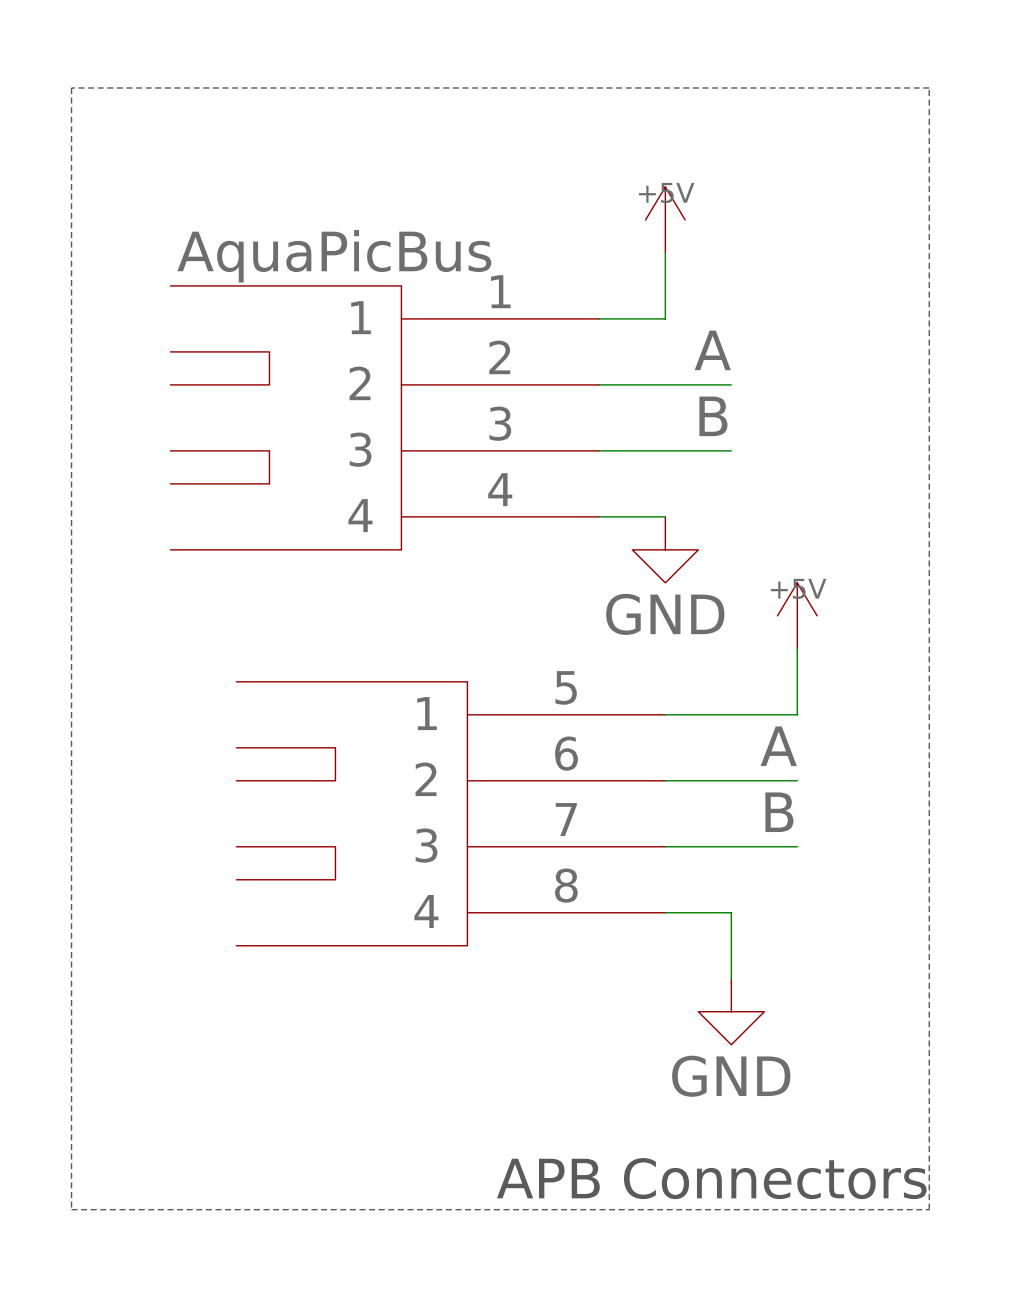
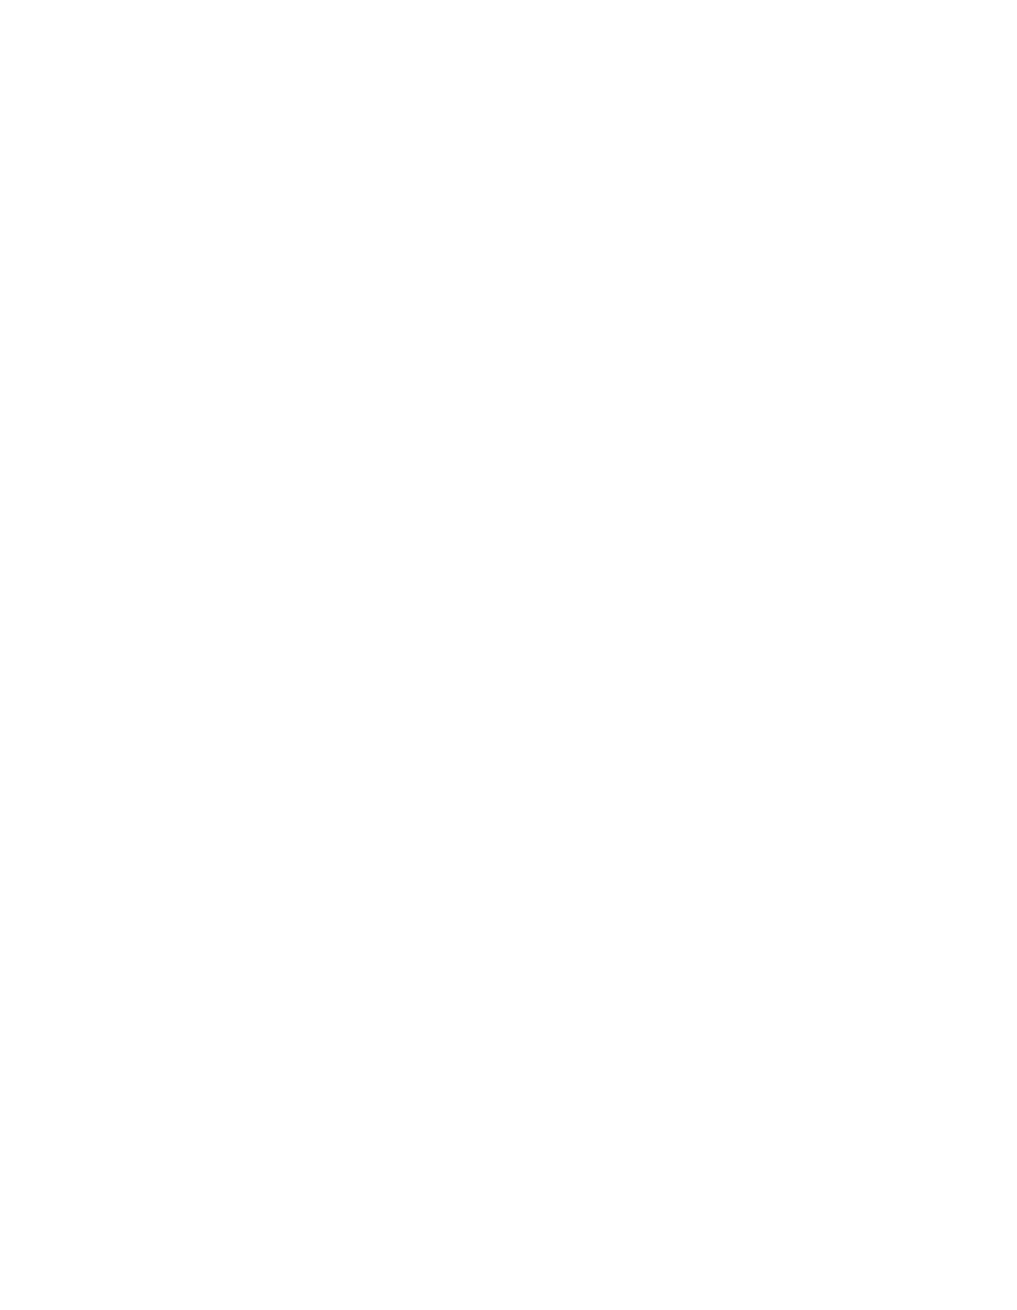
line: (71, 87) (71, 1209) (929, 1209) (929, 87) (71, 87) -> none
power symbol: +5V (665, 219) -> none
wire: (665, 252) (665, 318) (599, 318) -> none
label: A (712, 350) -> none
wire: (599, 384) (731, 384) -> none
label: B (713, 416) -> none
wire: (599, 450) (731, 450) -> none
wire: (599, 516) (665, 516) -> none
power symbol: GND (665, 549) -> none
AquaPicBus: (417, 615) -> none
power symbol: +5V (797, 615) -> none
wire: (797, 648) (797, 714) (665, 714) -> none
label: A (778, 746) -> none
wire: (665, 780) (797, 780) -> none
label: B (779, 812) -> none
wire: (665, 846) (797, 846) -> none
wire: (665, 912) (731, 912) (731, 978) -> none
power symbol: GND (731, 1011) -> none
text: APB Connectors (711, 1178) -> none

